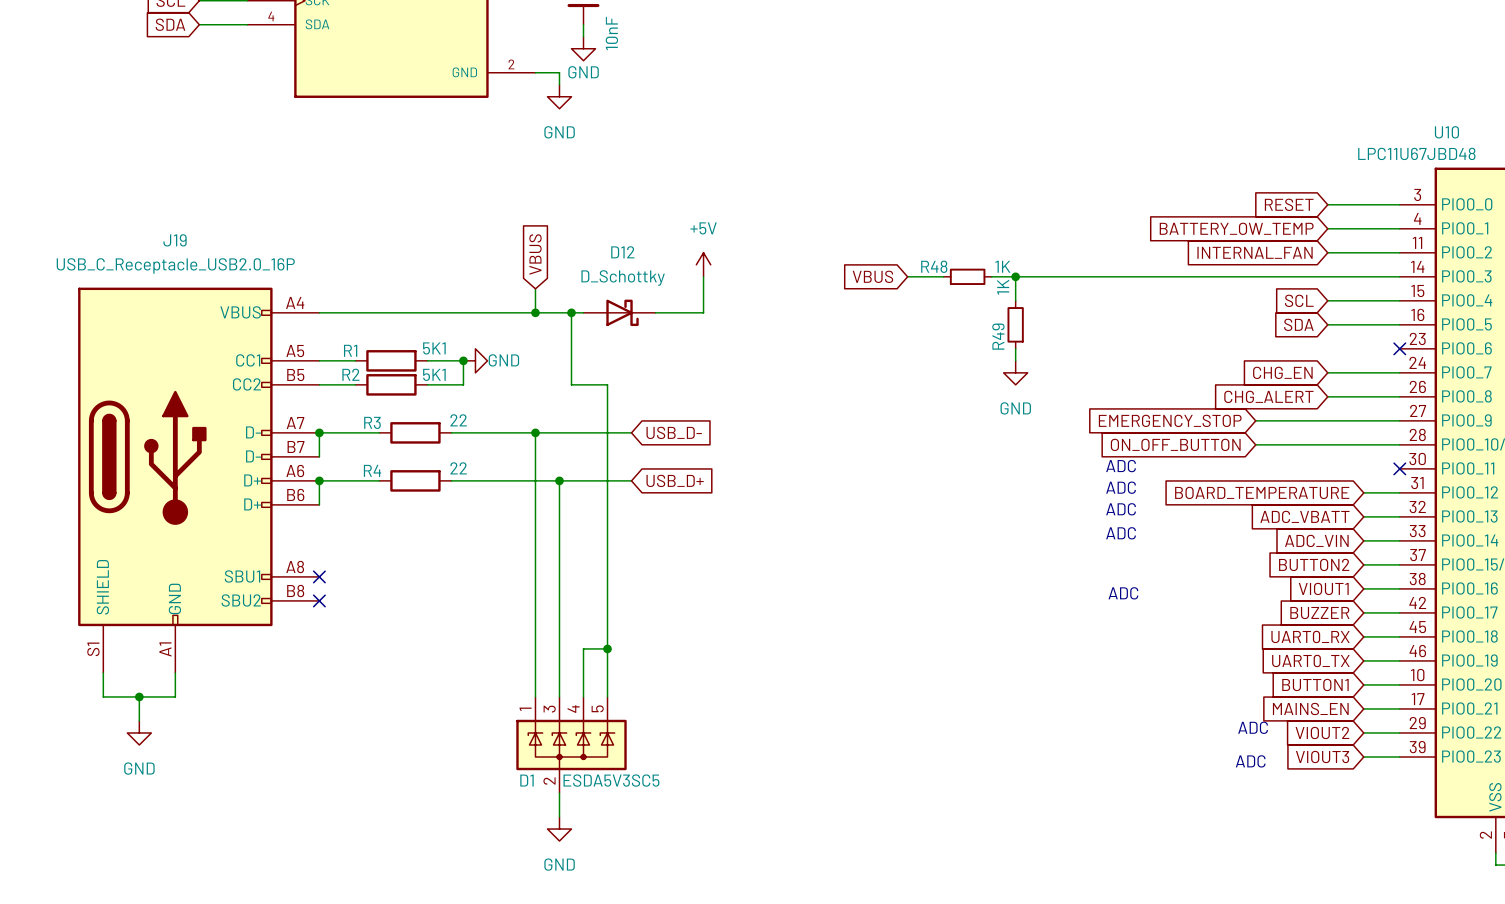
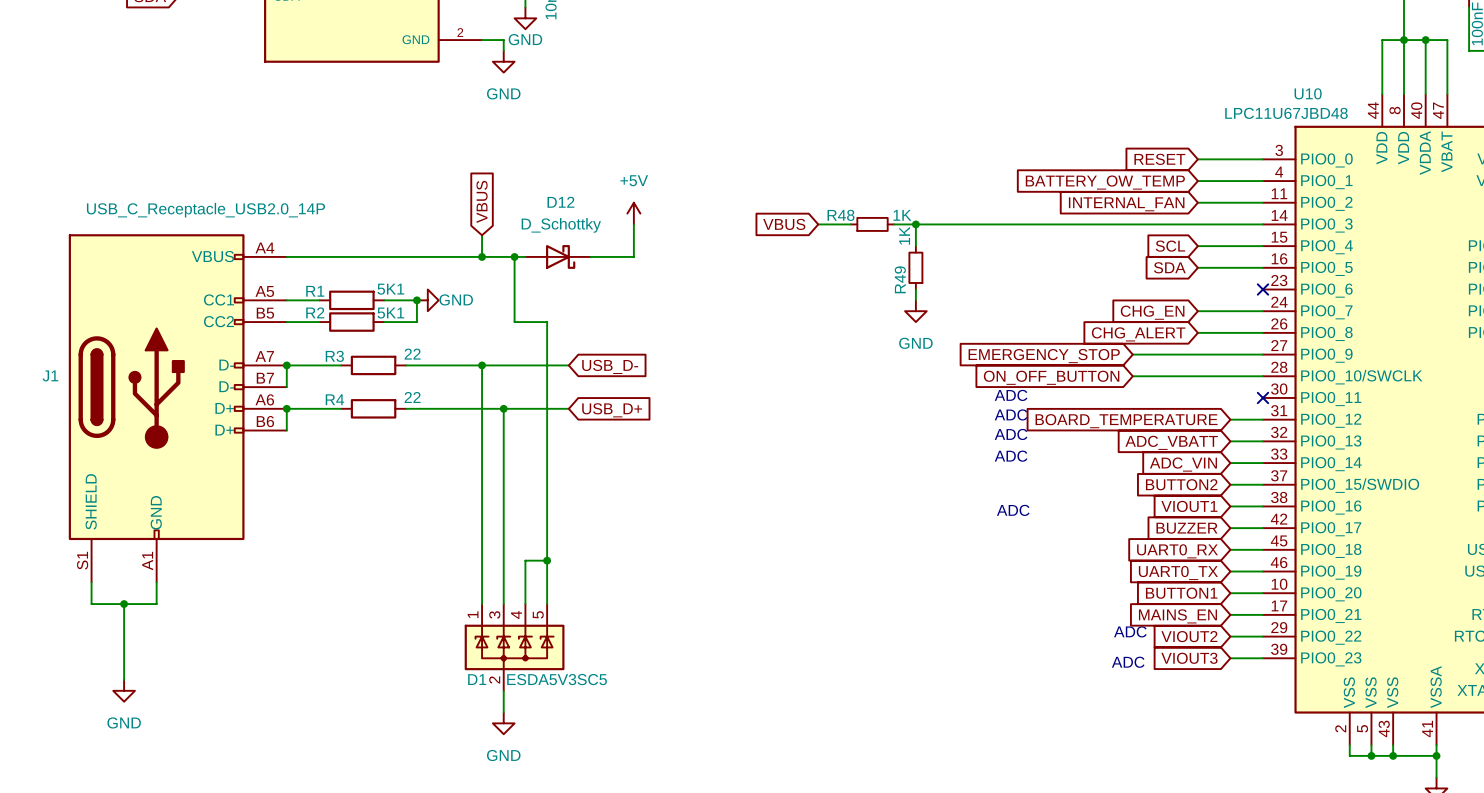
J19: USB_C_Receptacle_USB2.0_16P (198, 480) -> none
J1: none -> USB_C_Receptacle_USB2.0_14P (177, 408)
no-connect mark: (319, 576) -> none
no-connect mark: (319, 600) -> none
wire: none -> (124, 625) (124, 679)
power symbol position: GND (139, 732) -> GND (124, 690)

